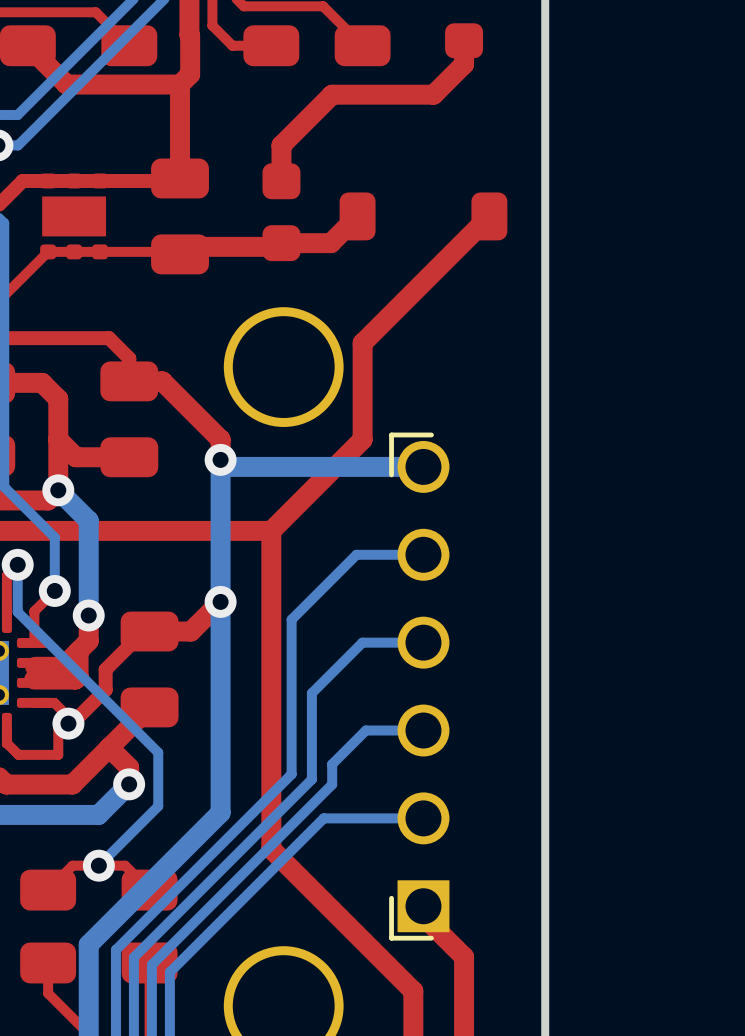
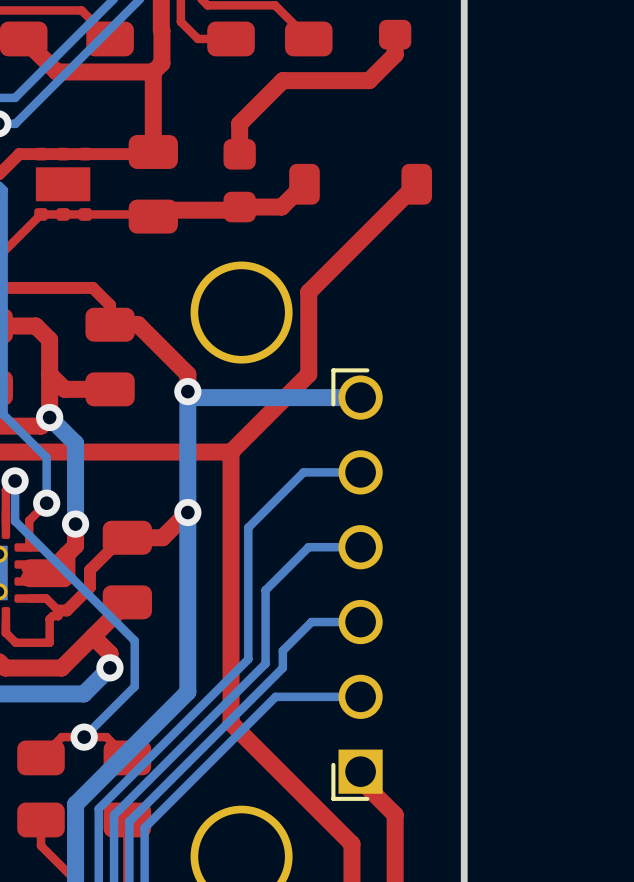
via: (68, 723) -> none

